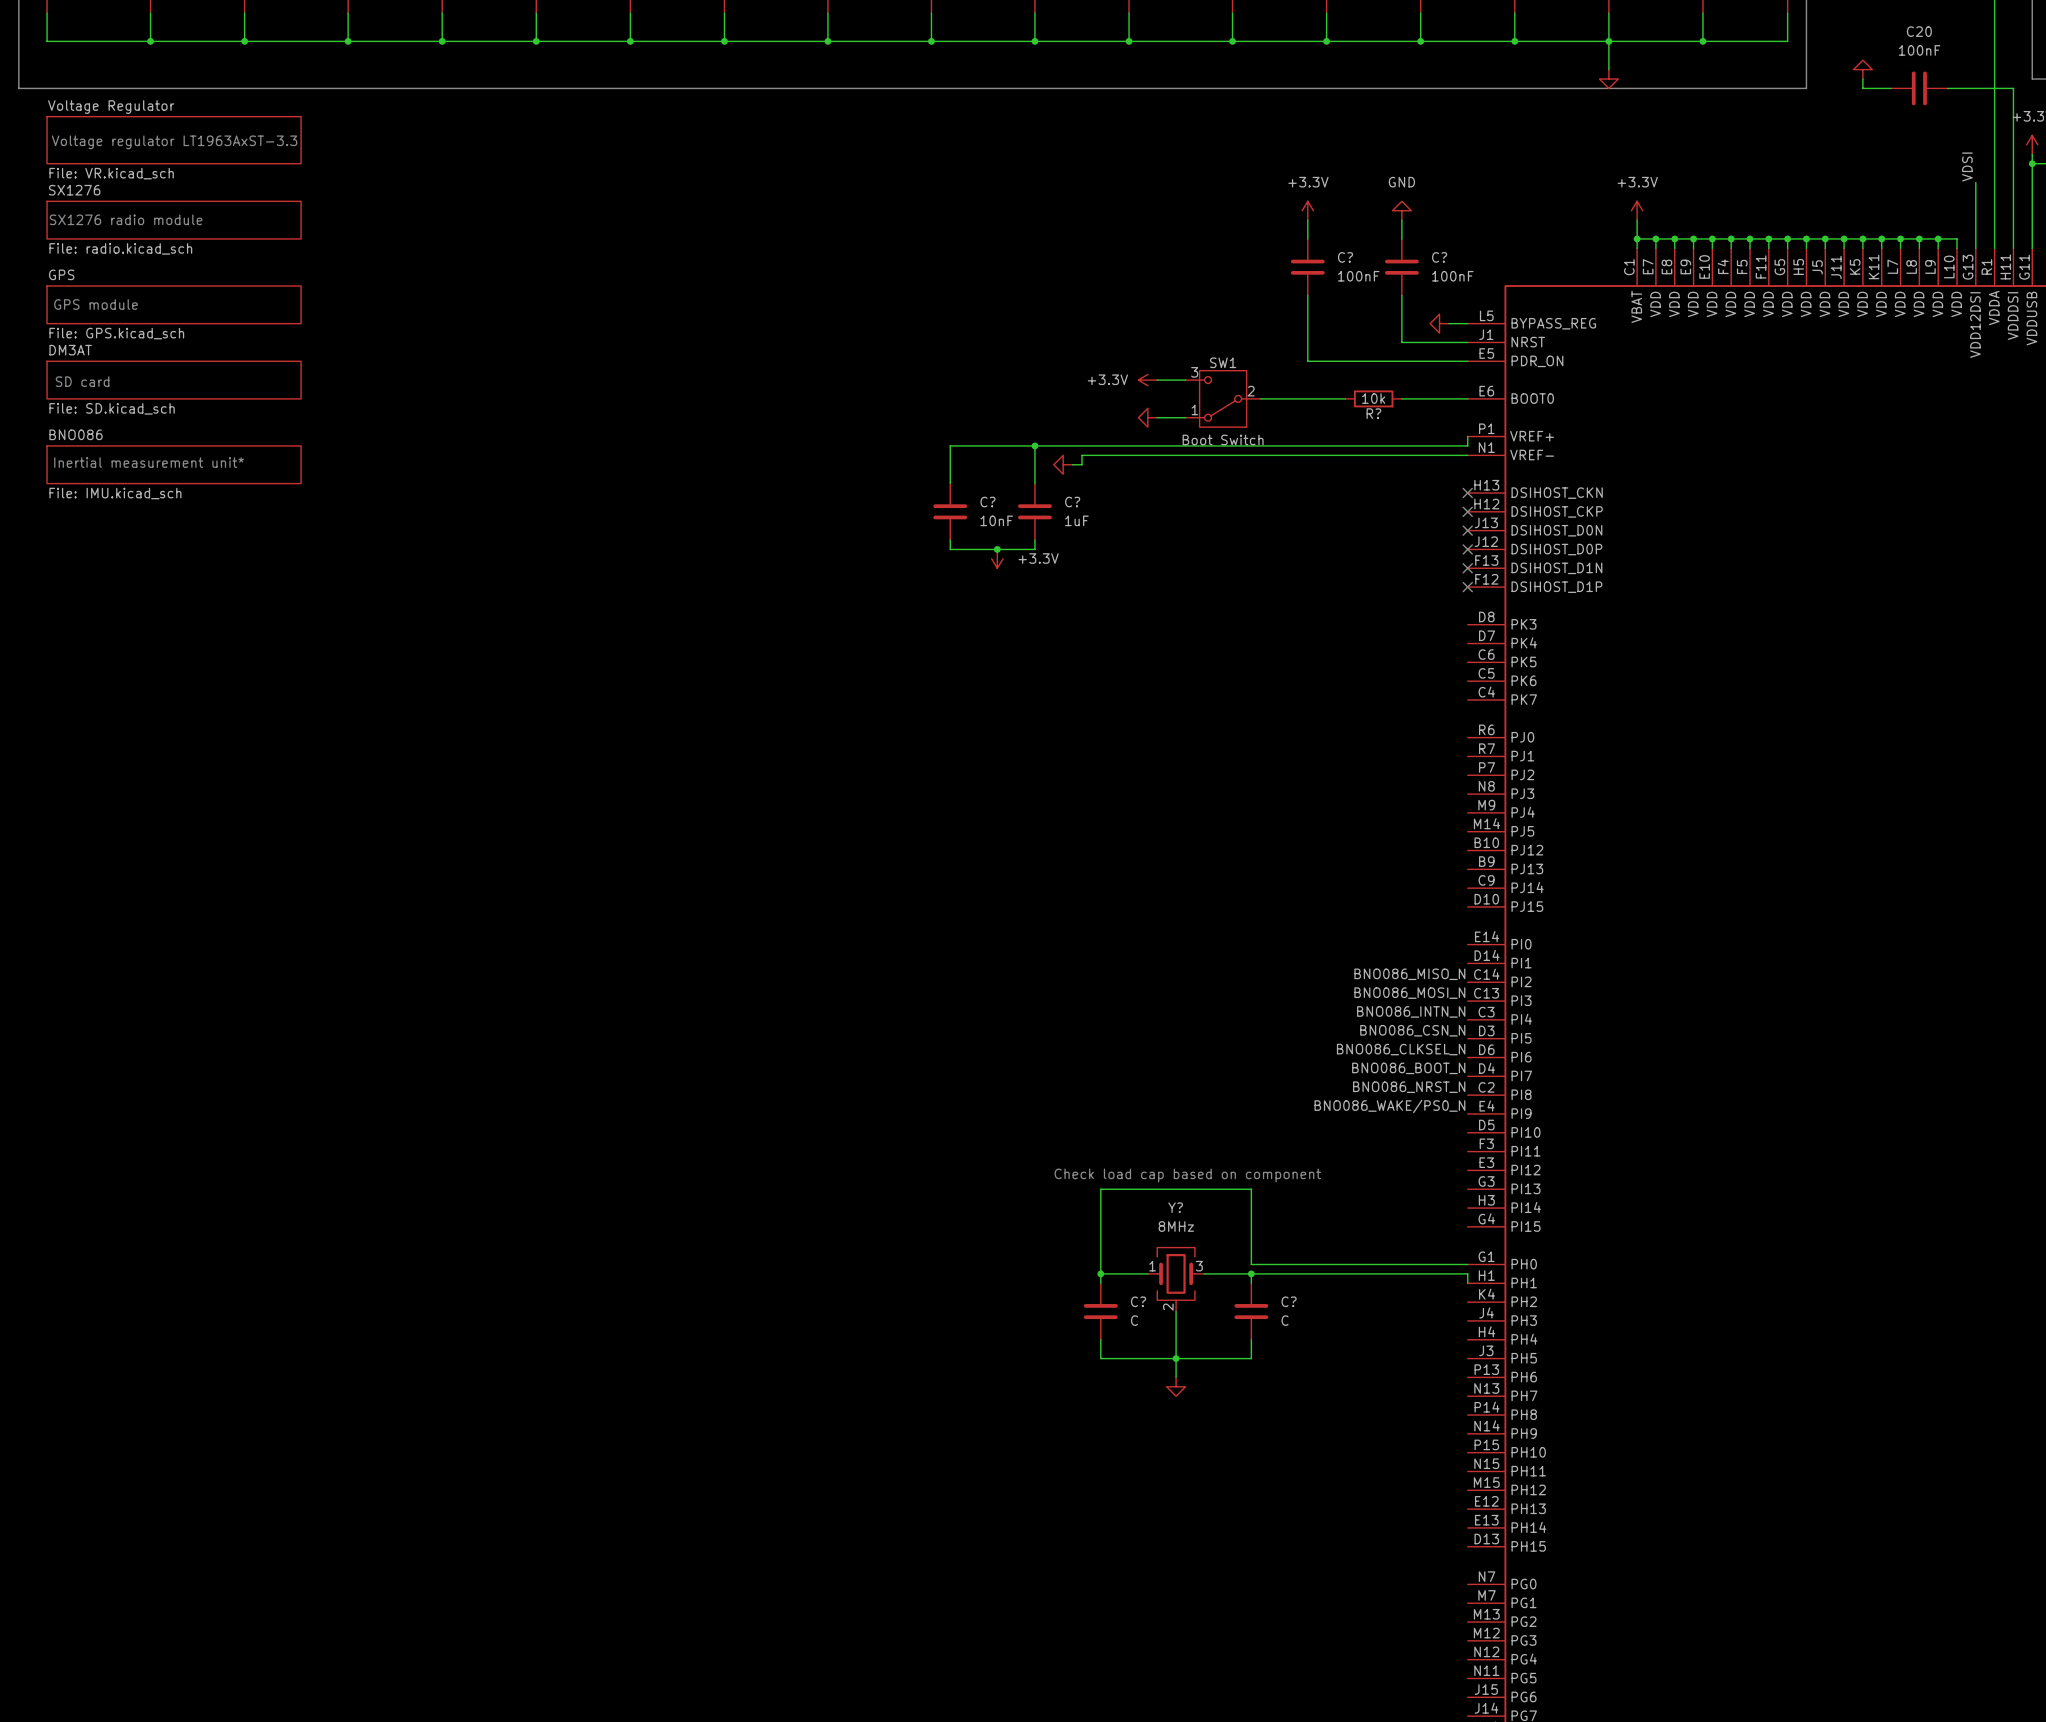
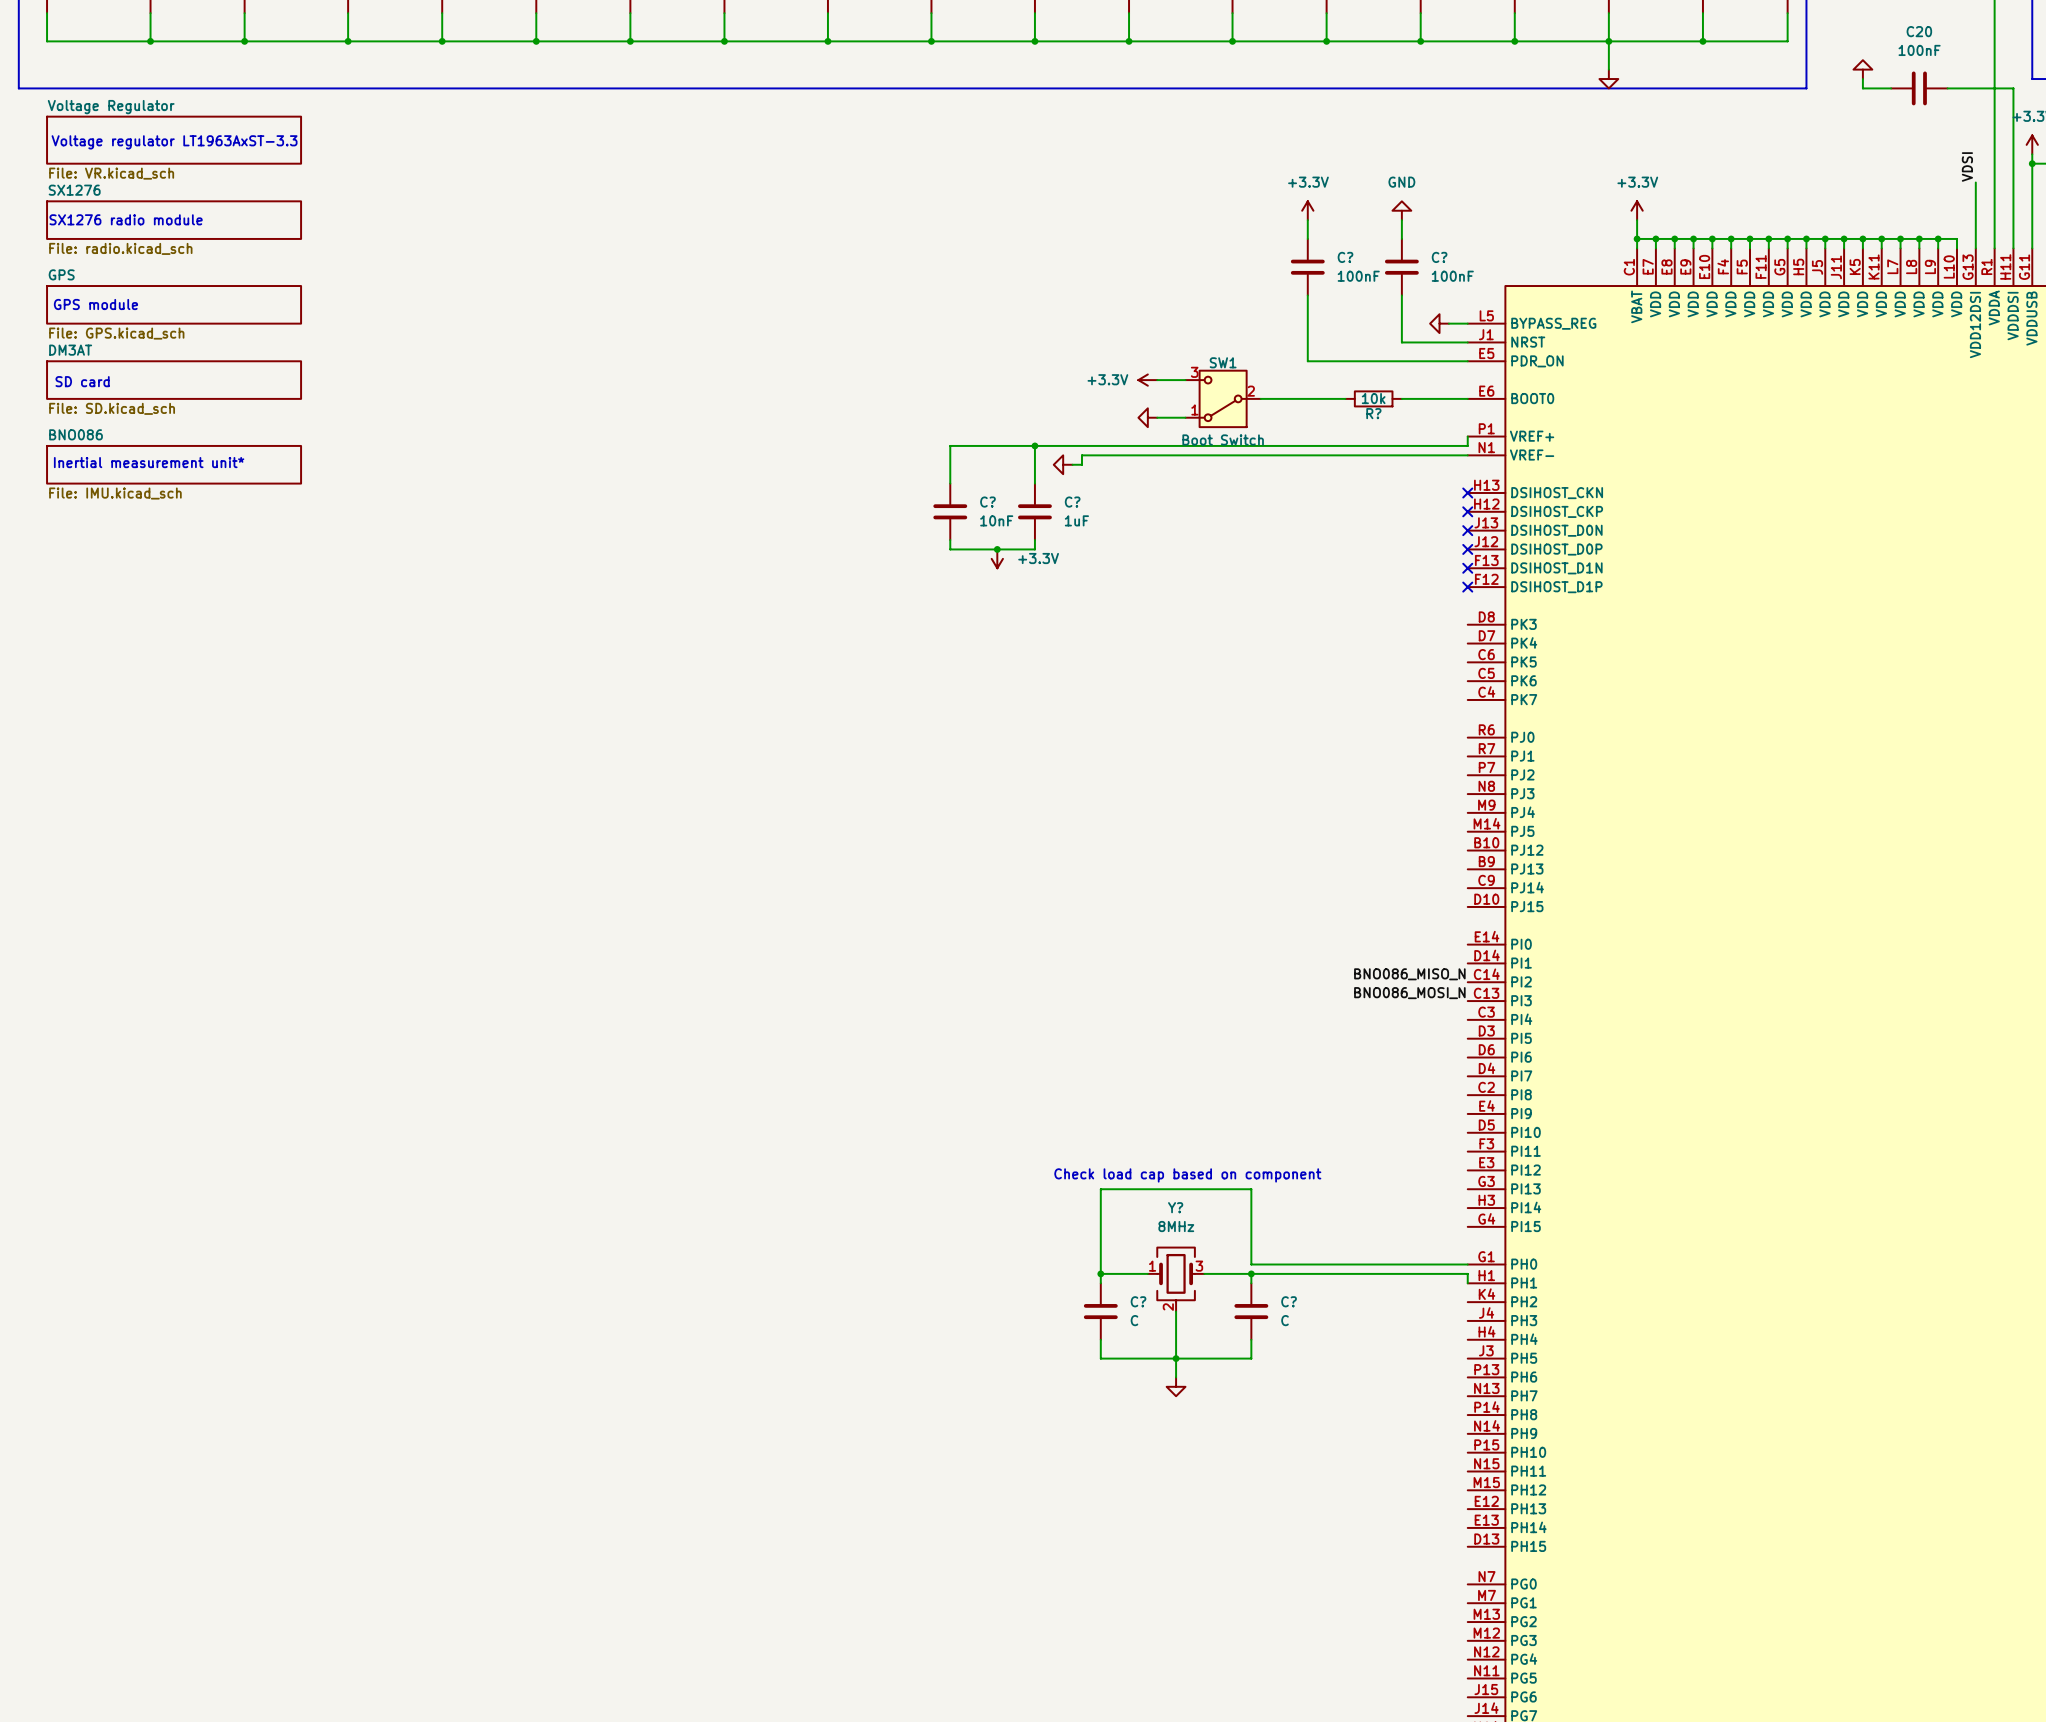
label: BNO086_INTN_N (1411, 1011) -> none
label: BNO086_CSN_N (1412, 1030) -> none
label: BNO086_CLKSEL_N (1401, 1049) -> none
label: BNO086_BOOT_N (1408, 1068) -> none
label: BNO086_NRST_N (1409, 1087) -> none
label: BNO086_WAKE/PS0_N (1389, 1106) -> none

